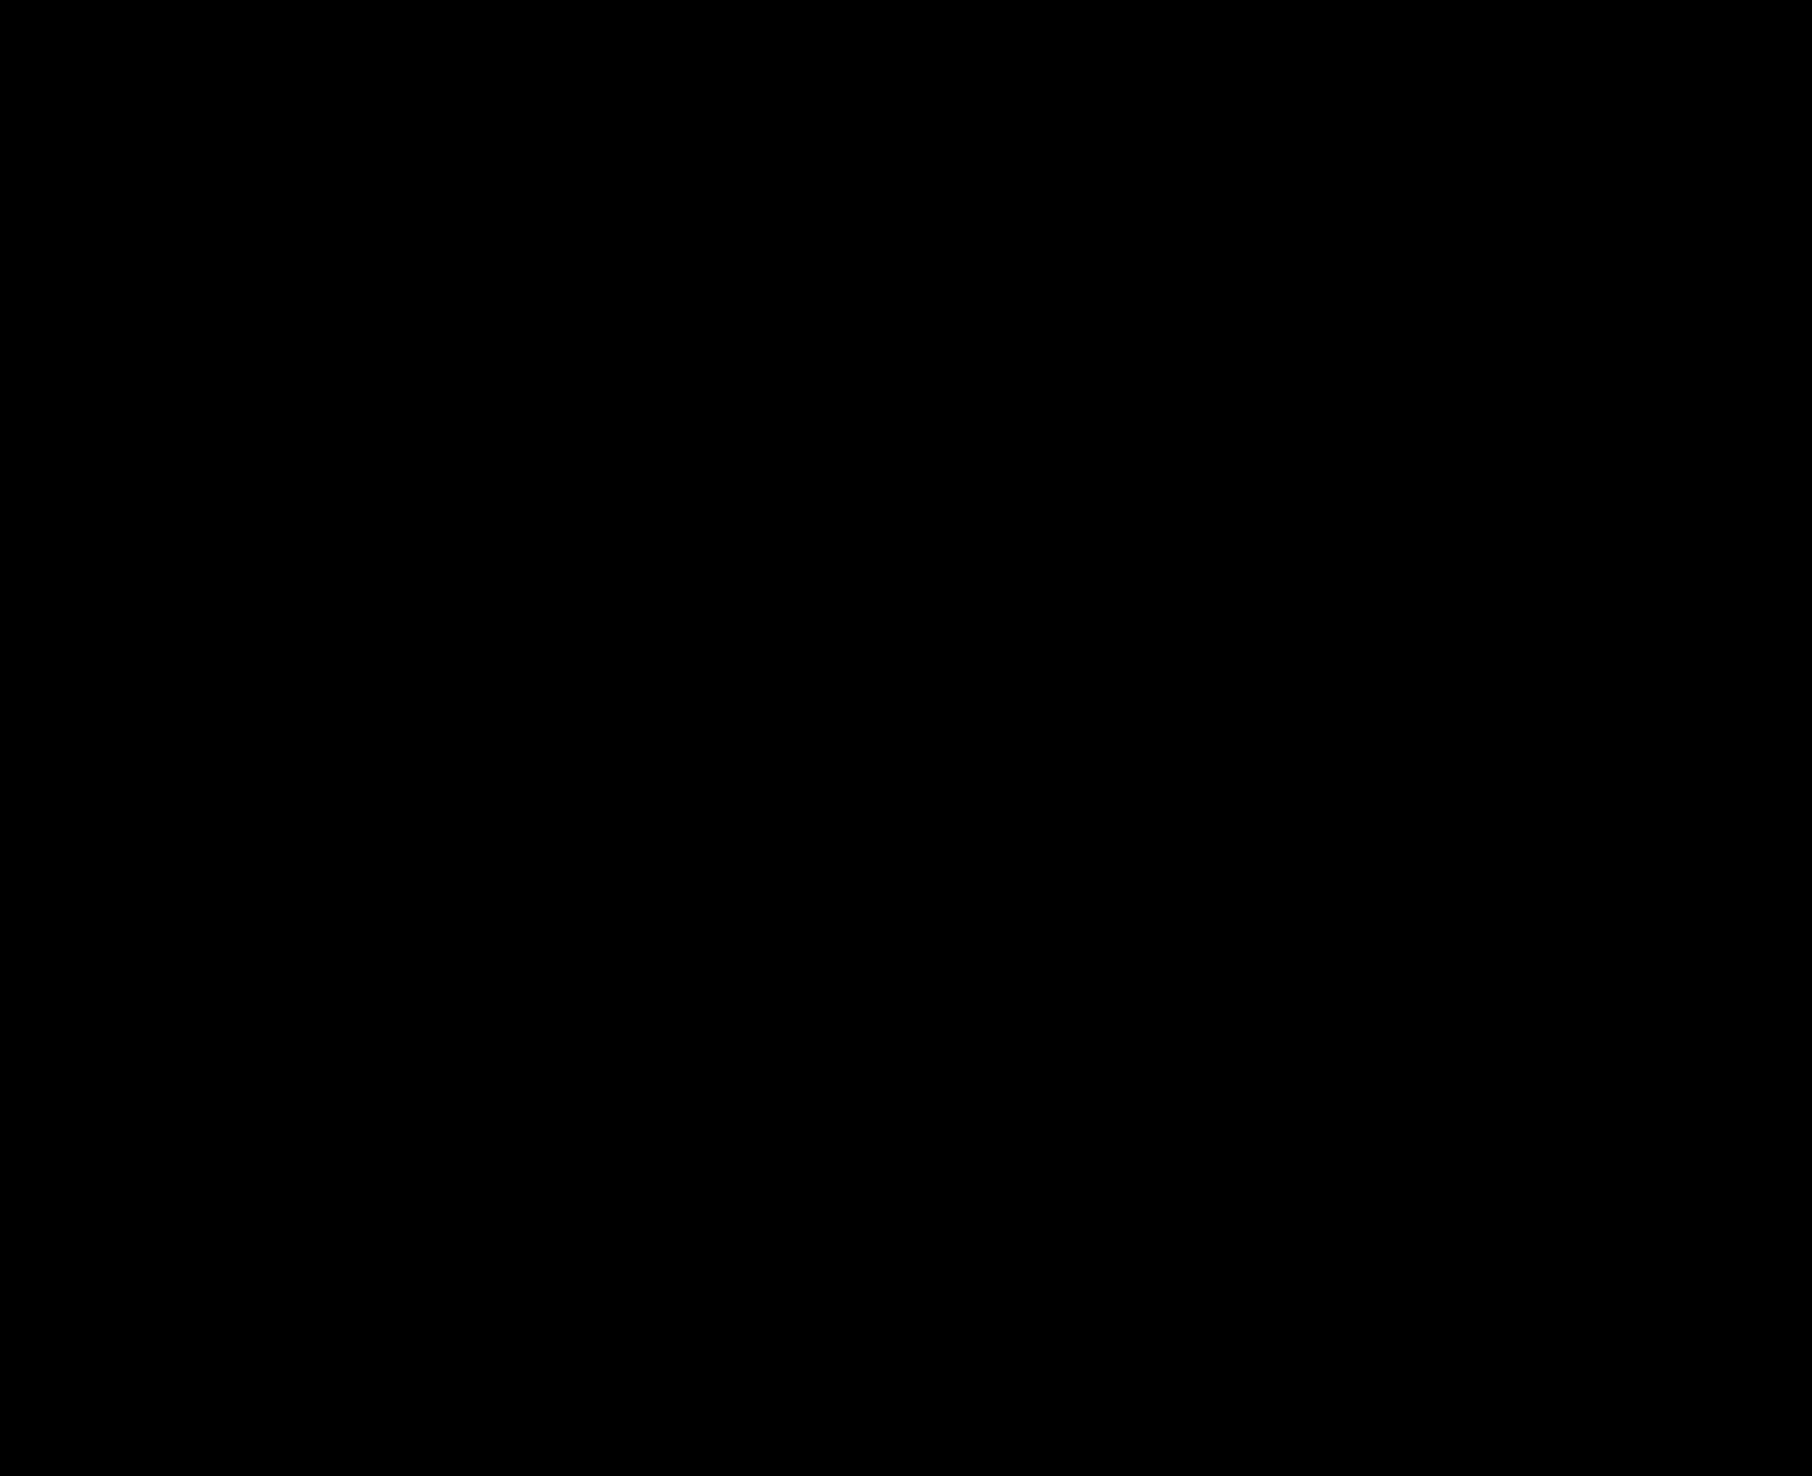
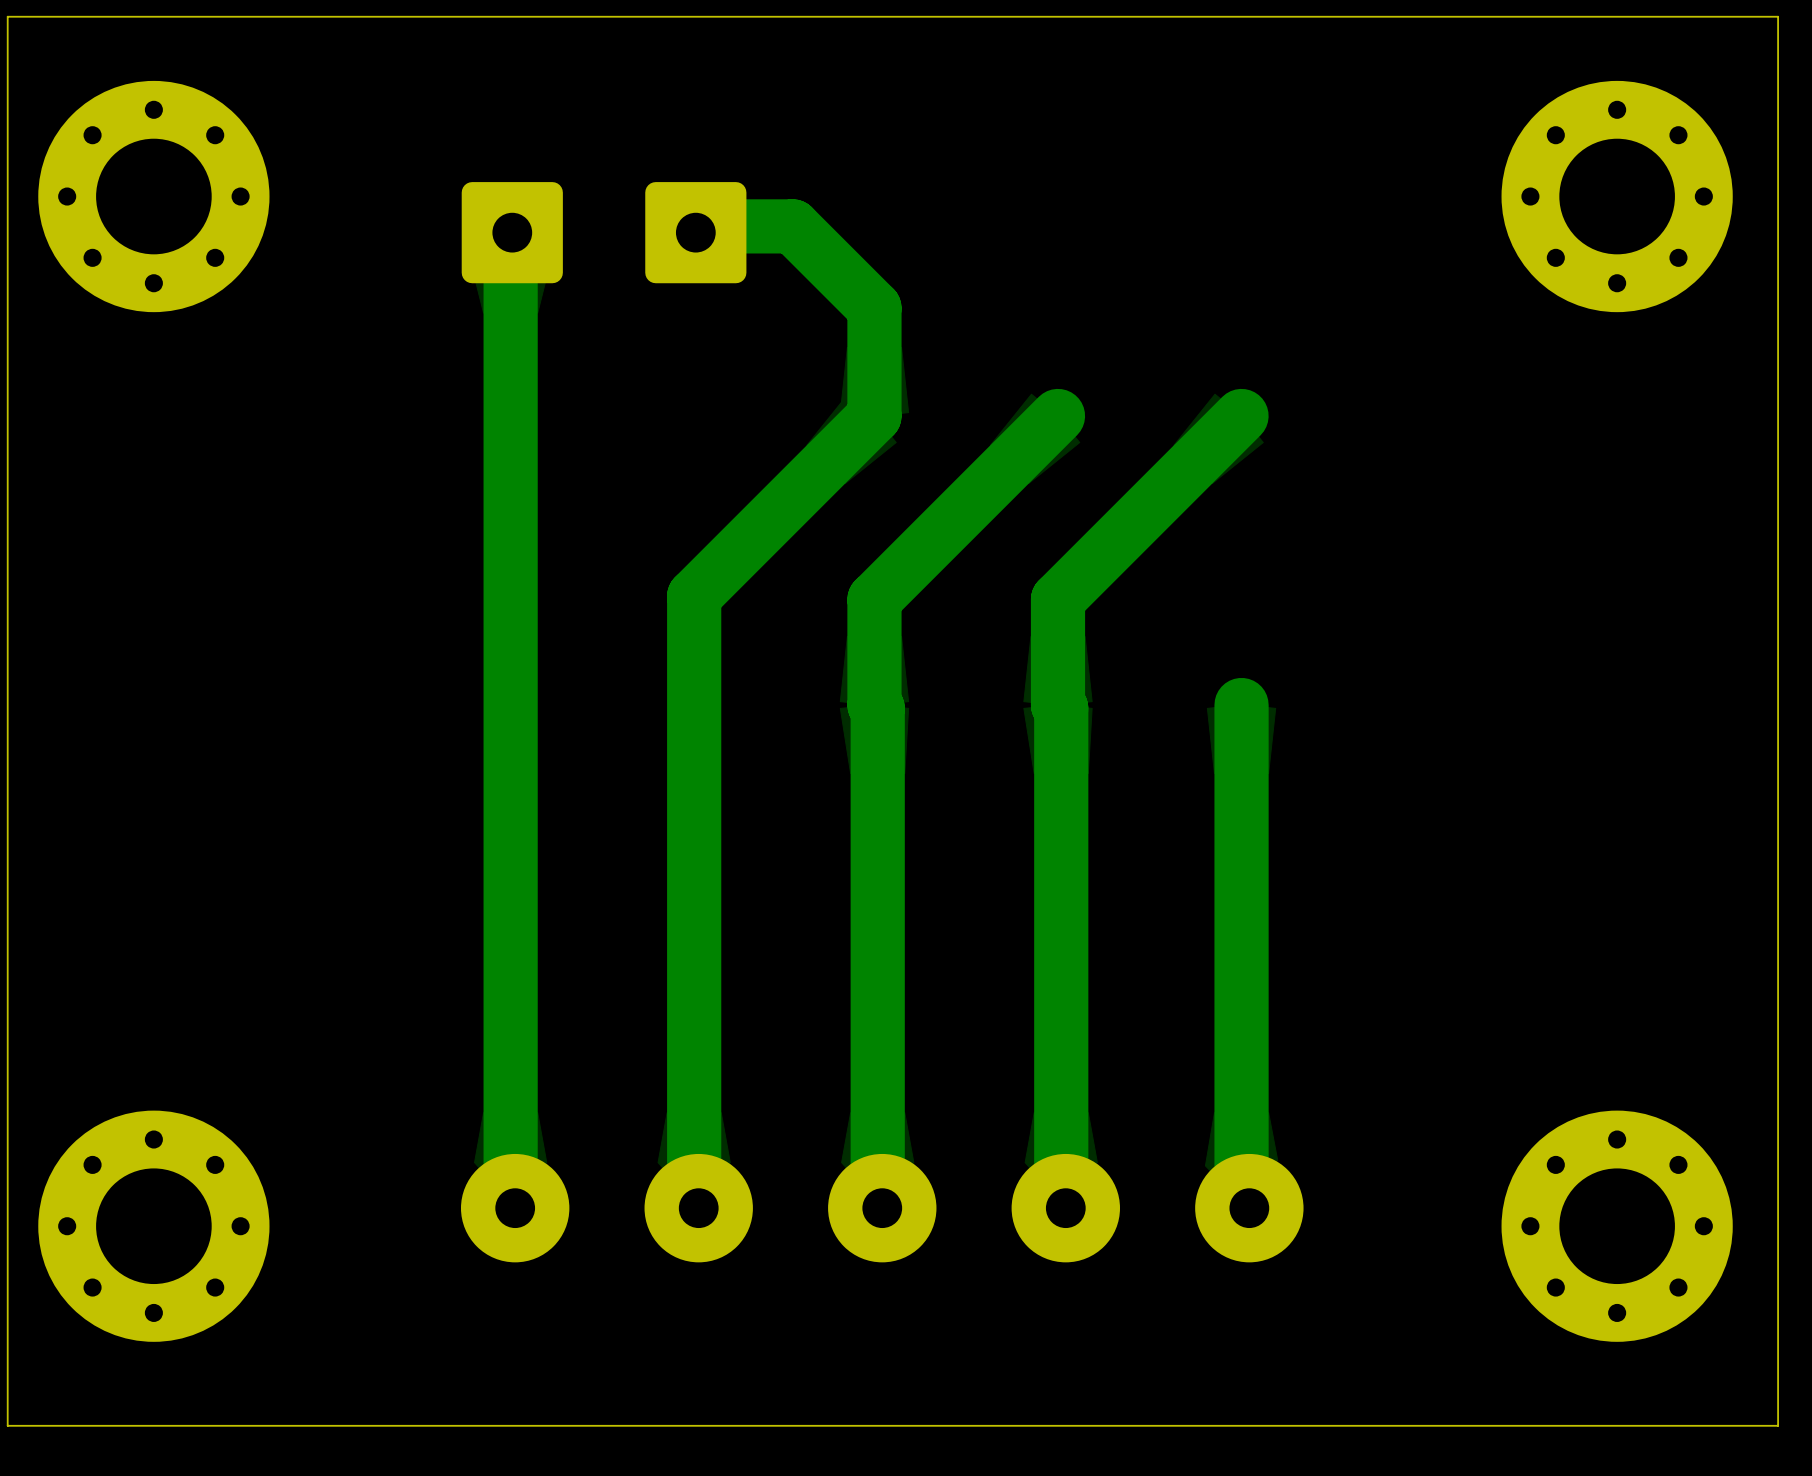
board edge: none -> (1778, 16) (7, 16) (7, 1425) (1778, 1425) (1778, 16)
part: none -> (153, 196)
part: none -> (1617, 196)
track: none -> (510, 226) (510, 1202)
track: none -> (694, 226) (792, 226) (874, 308) (874, 415) (694, 596) (694, 1202)
part: none -> (604, 232)
track: none -> (1058, 415) (874, 599) (874, 705) (877, 708) (877, 1202)
track: none -> (1241, 415) (1058, 599) (1058, 705) (1061, 708) (1061, 1202)
track: none -> (1241, 705) (1241, 1199) (1244, 1202)
part: none -> (882, 1208)
part: none -> (153, 1226)
part: none -> (1617, 1226)

